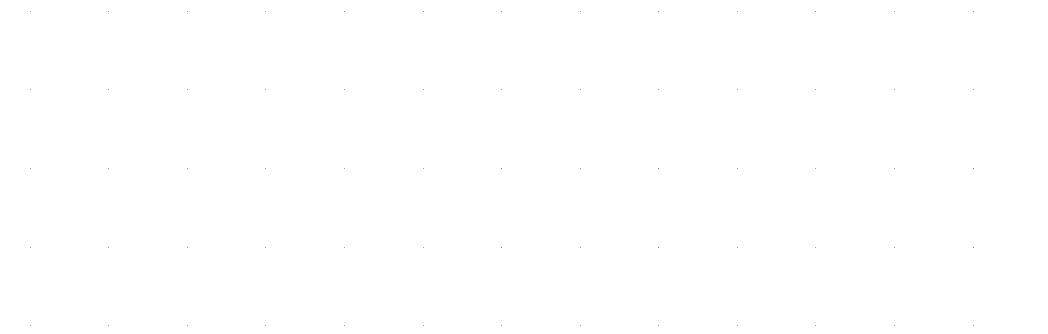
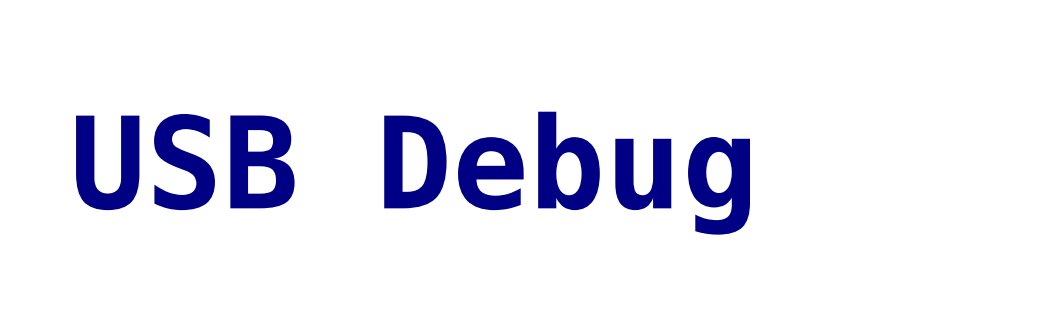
text: none -> USB Debug (413, 173)

